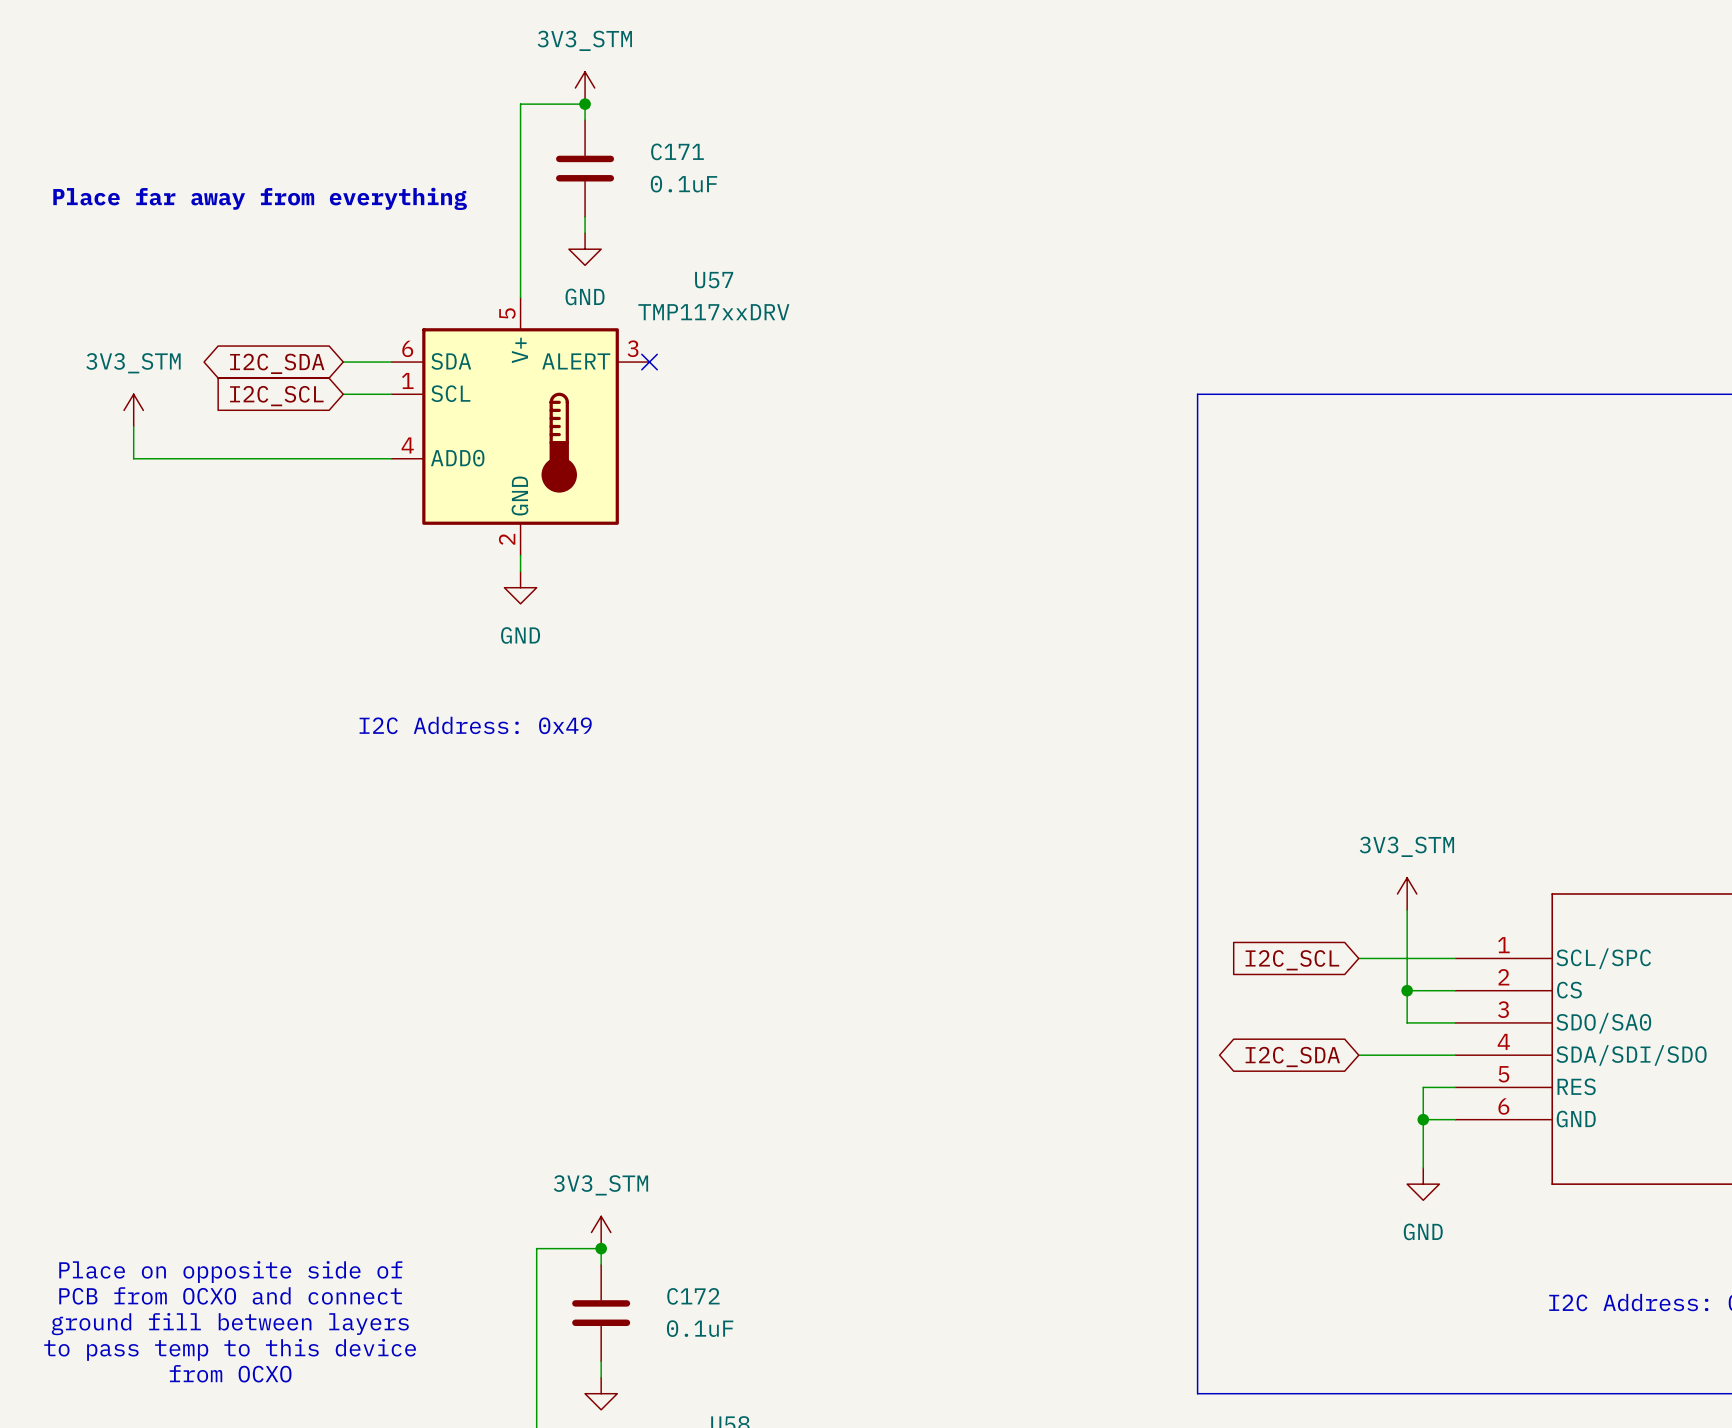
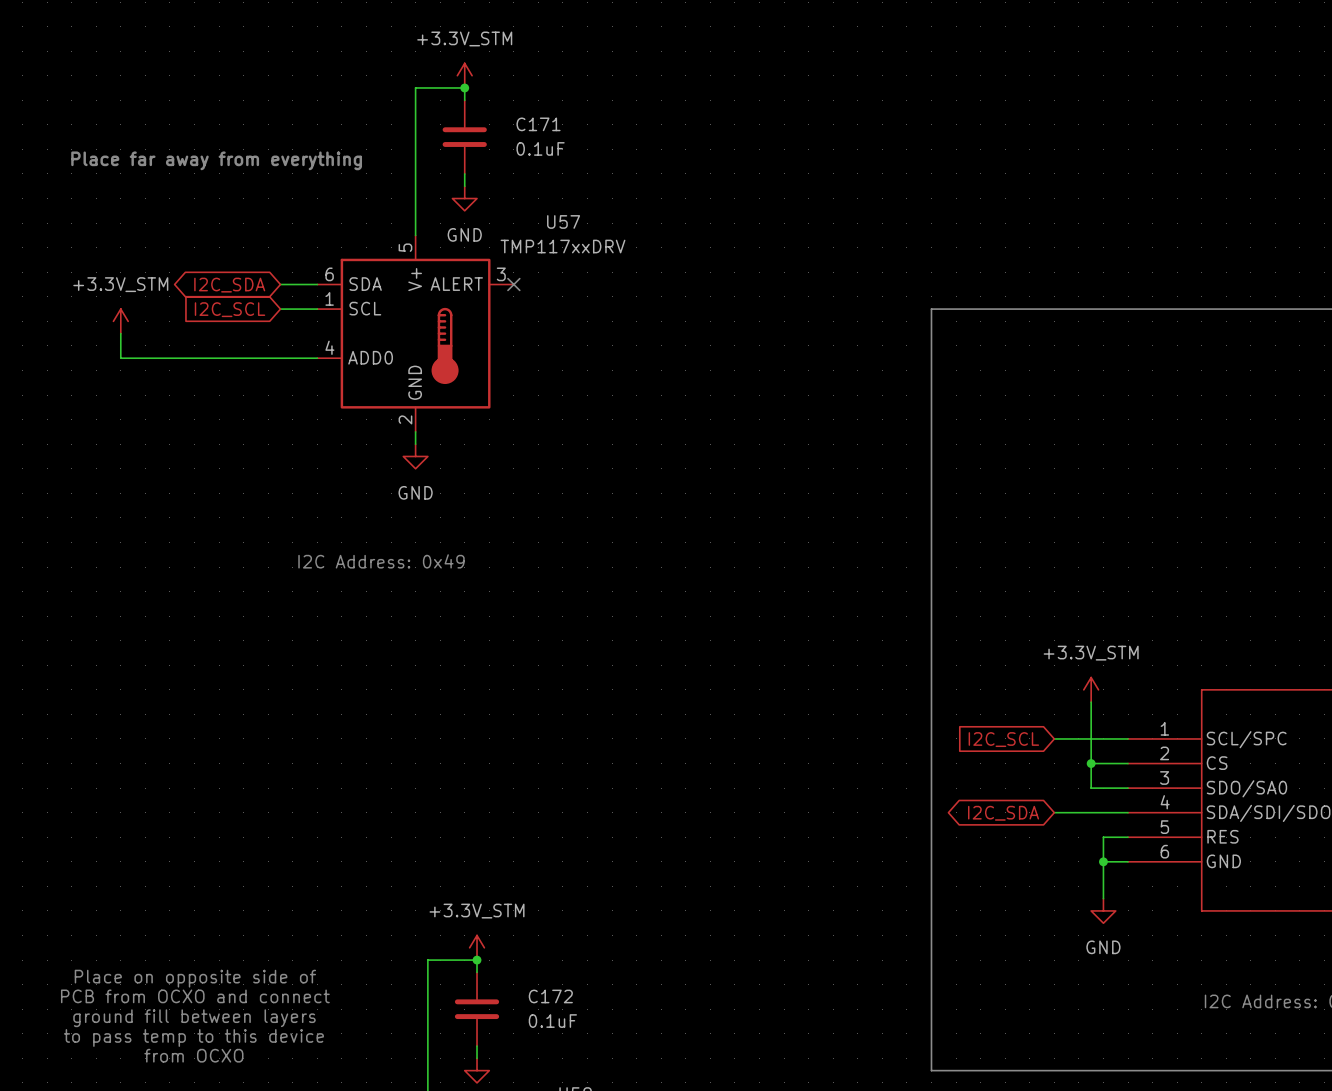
power symbol: 3V3_STM (585, 88) -> +3.3V_STM (464, 75)
power symbol: 3V3_STM (133, 410) -> +3.3V_STM (120, 321)
power symbol: 3V3_STM (1407, 893) -> +3.3V_STM (1091, 689)
power symbol: 3V3_STM (601, 1232) -> +3.3V_STM (477, 947)

